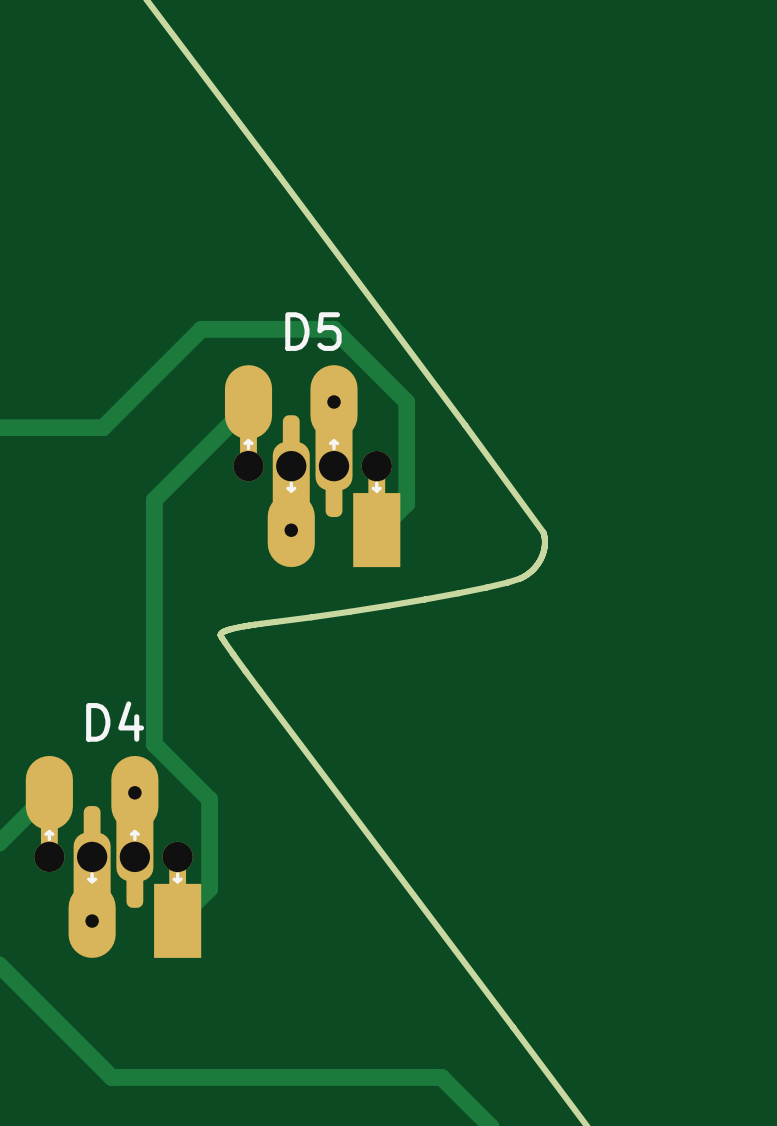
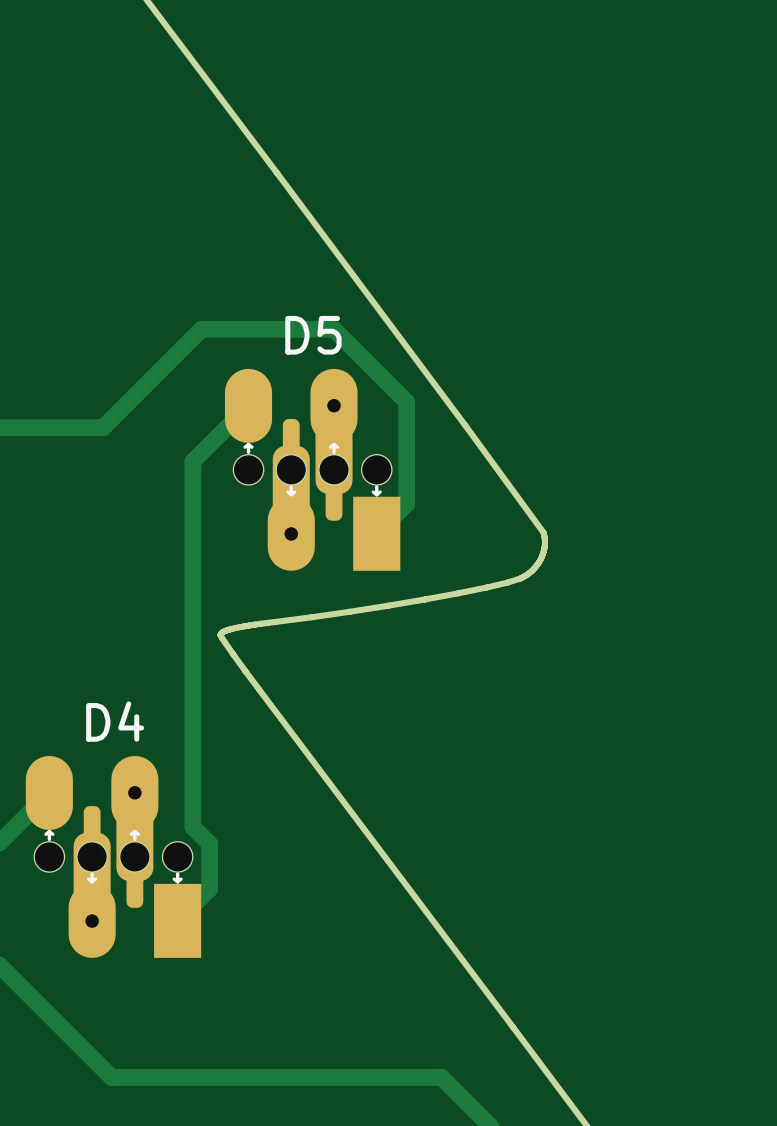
D5 footprint: [224, 365, 401, 568] -> [224, 368, 401, 571]
track: (192, 461) (154, 499) (154, 744) (209, 799) (209, 843) -> (192, 461) (192, 827) (209, 843)
D4 footprint: [25, 755, 202, 958] -> [25, 755, 202, 958]

